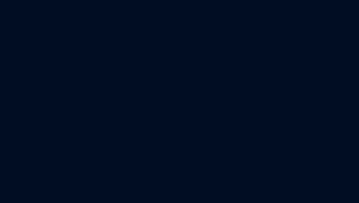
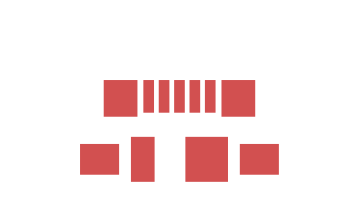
part: none -> (179, 130)

